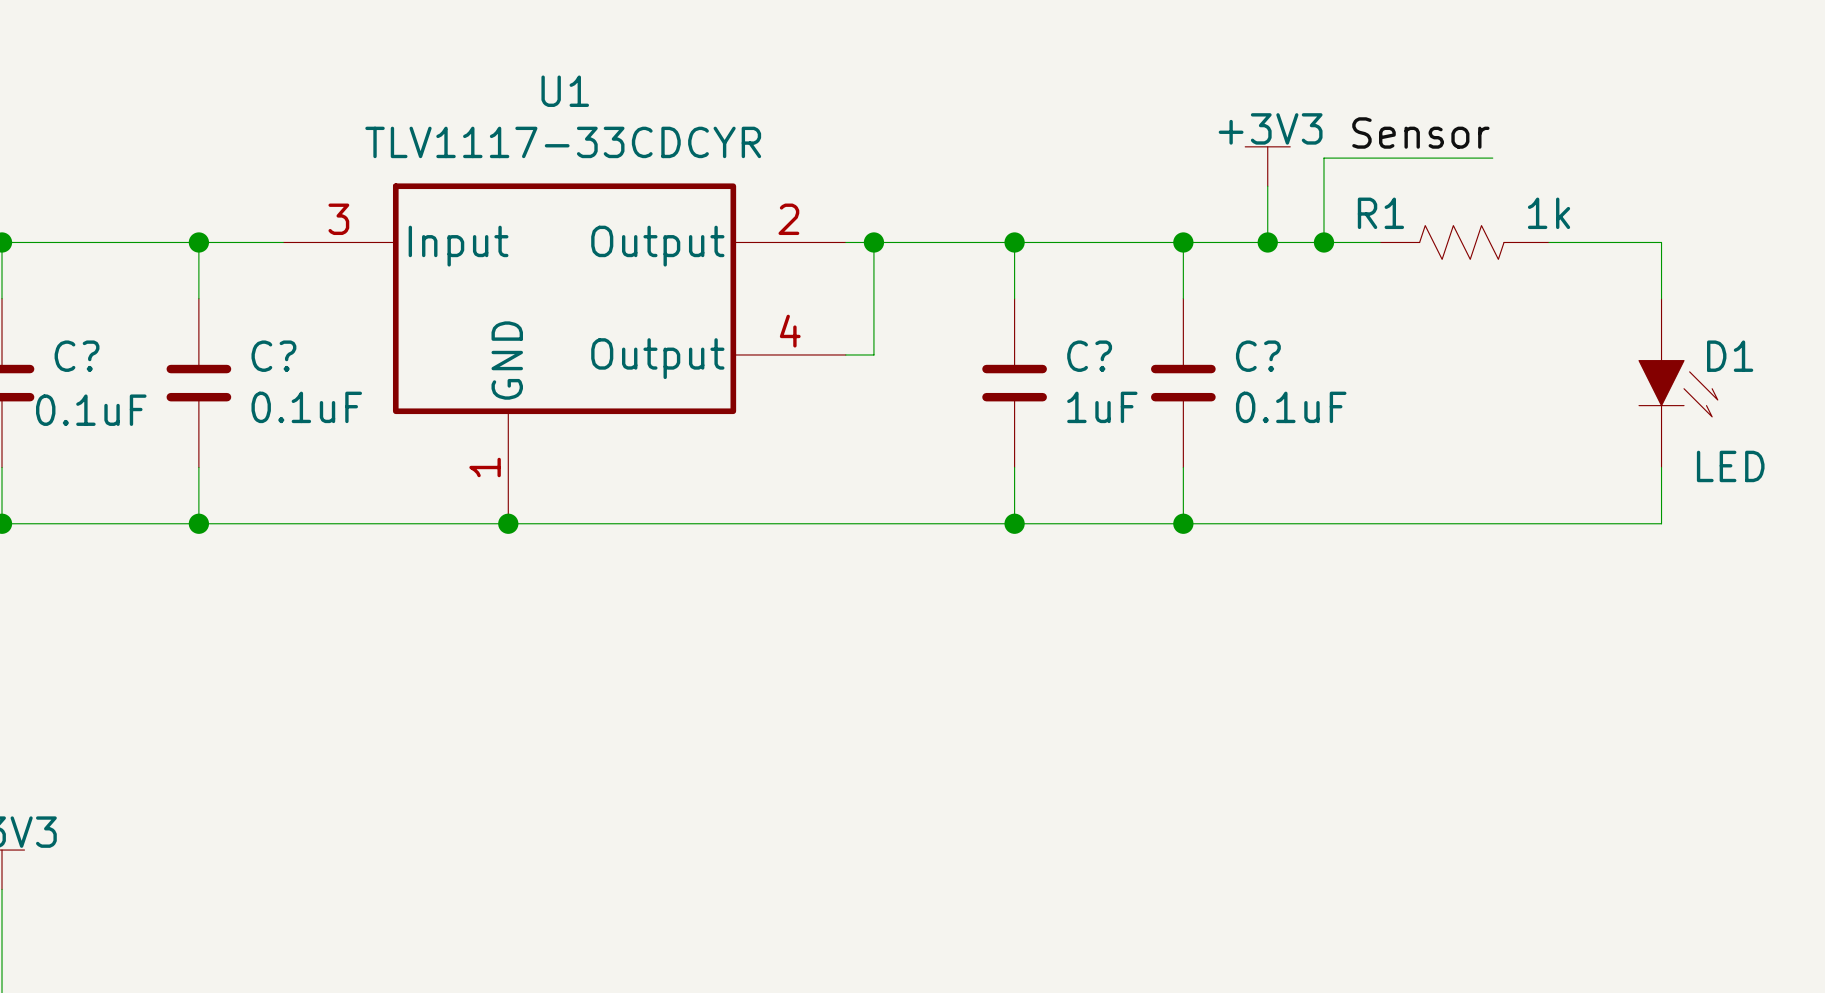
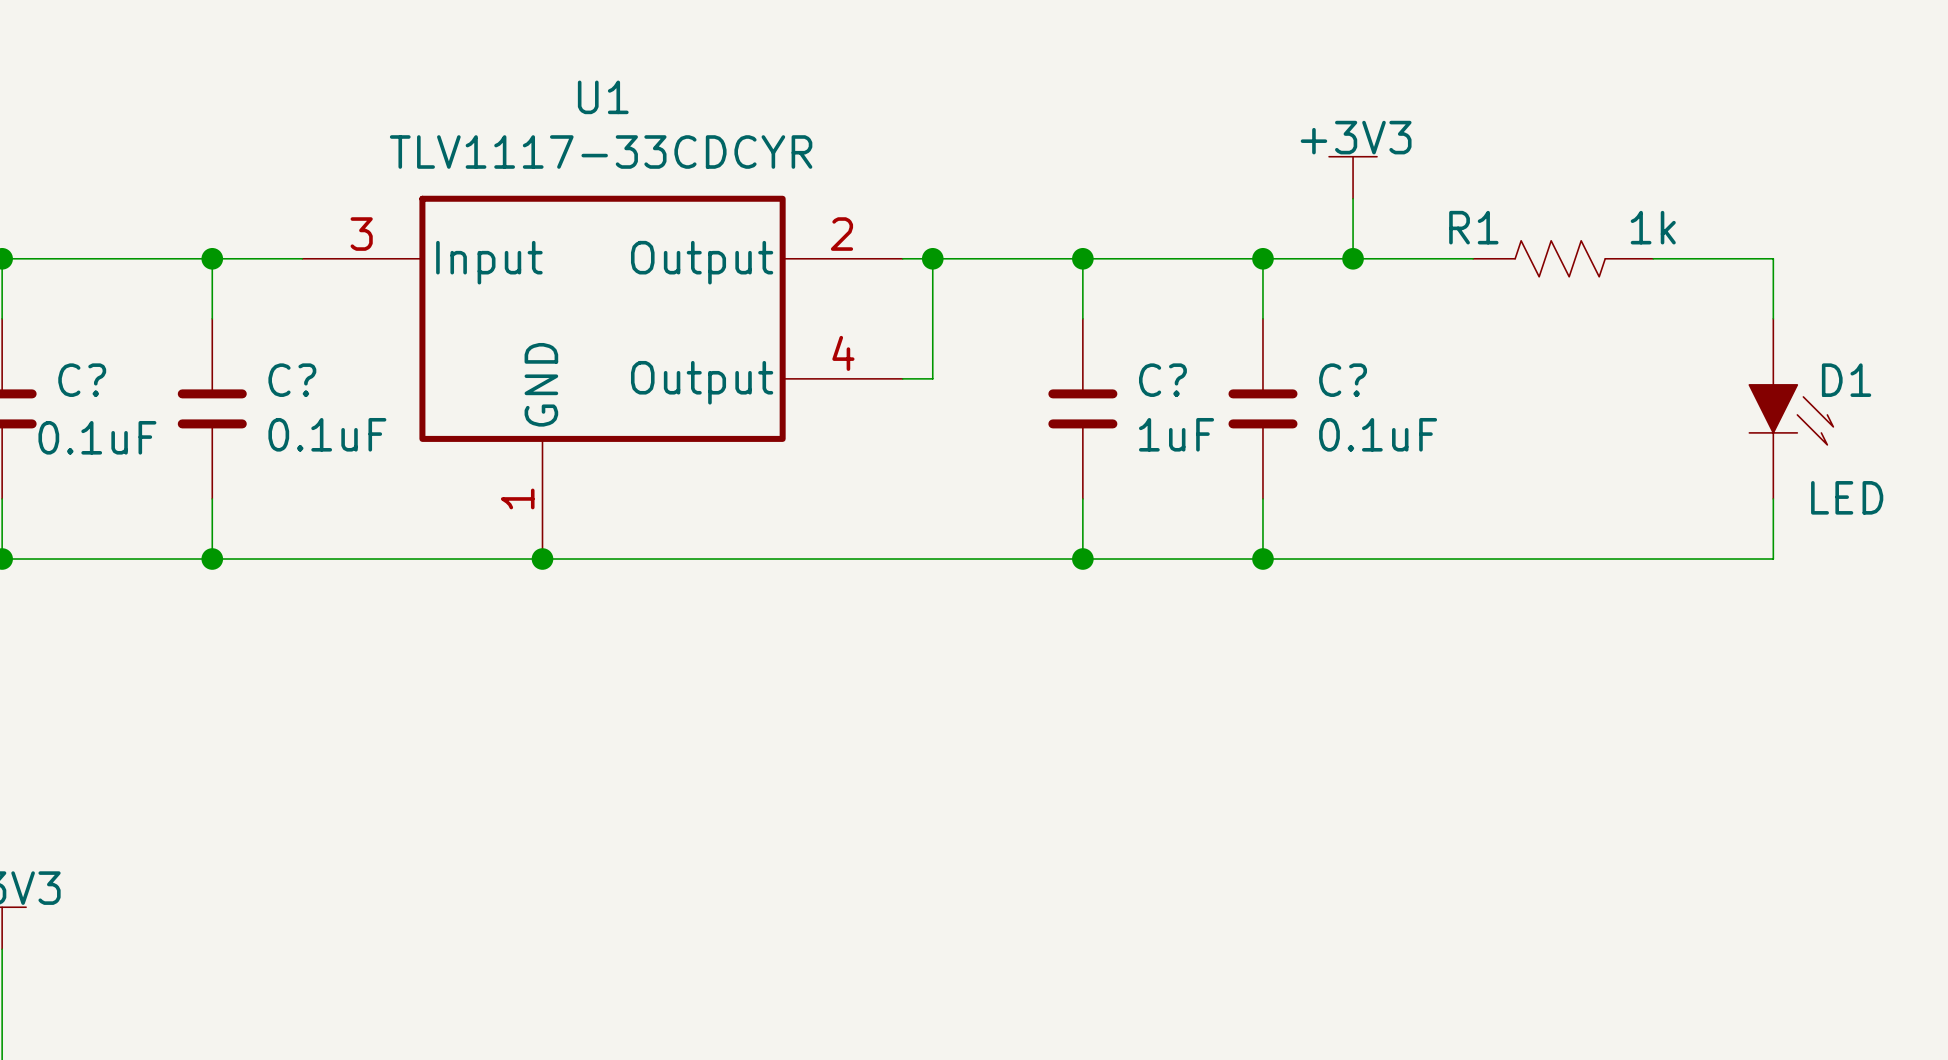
label: Sensor (1420, 132) -> none
wire: (1492, 158) (1323, 158) (1323, 242) -> none
junction: (1323, 242) -> none

